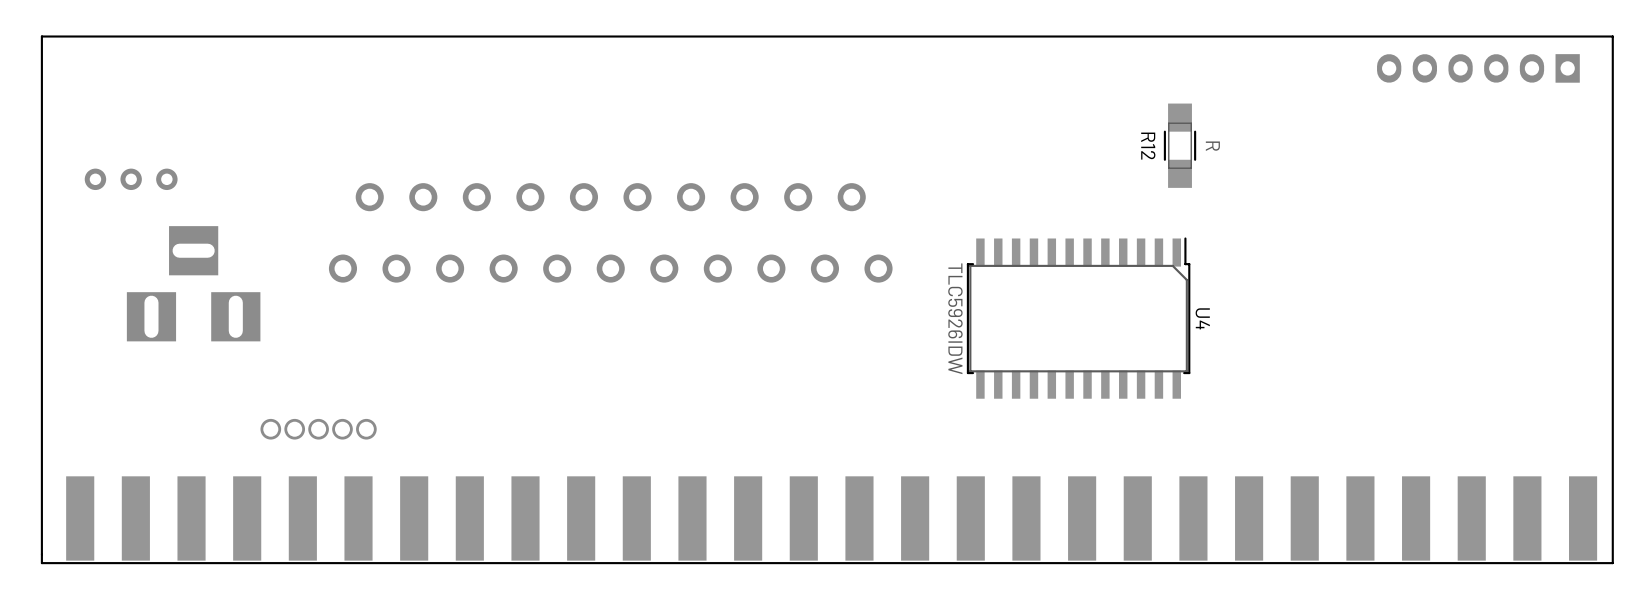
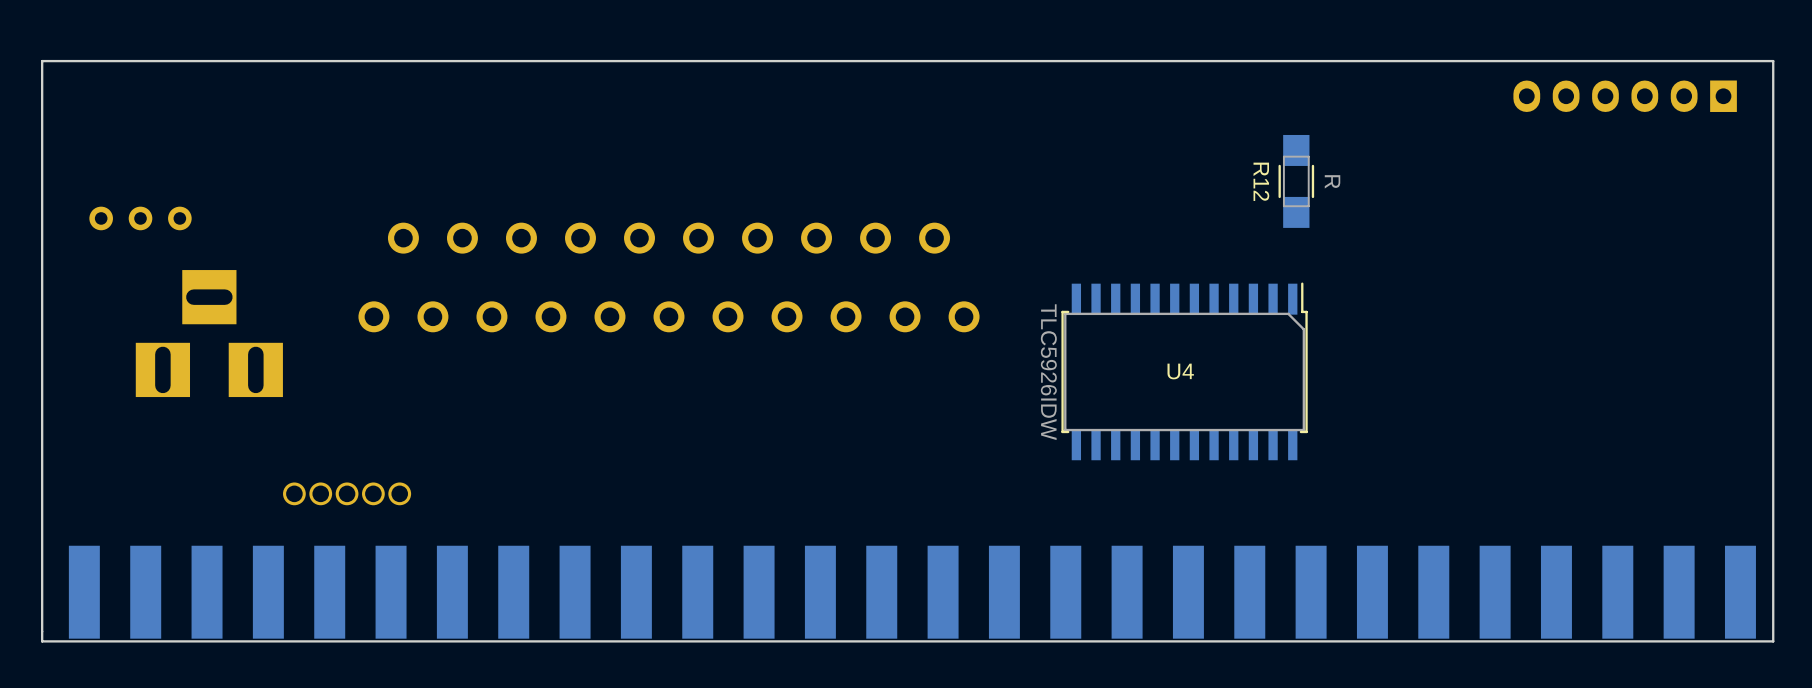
U4 name rotation: 0° (1202, 318) -> 90° counterclockwise (1180, 371)
U4 name position: U4 (1202, 318) -> U4 (1180, 371)

